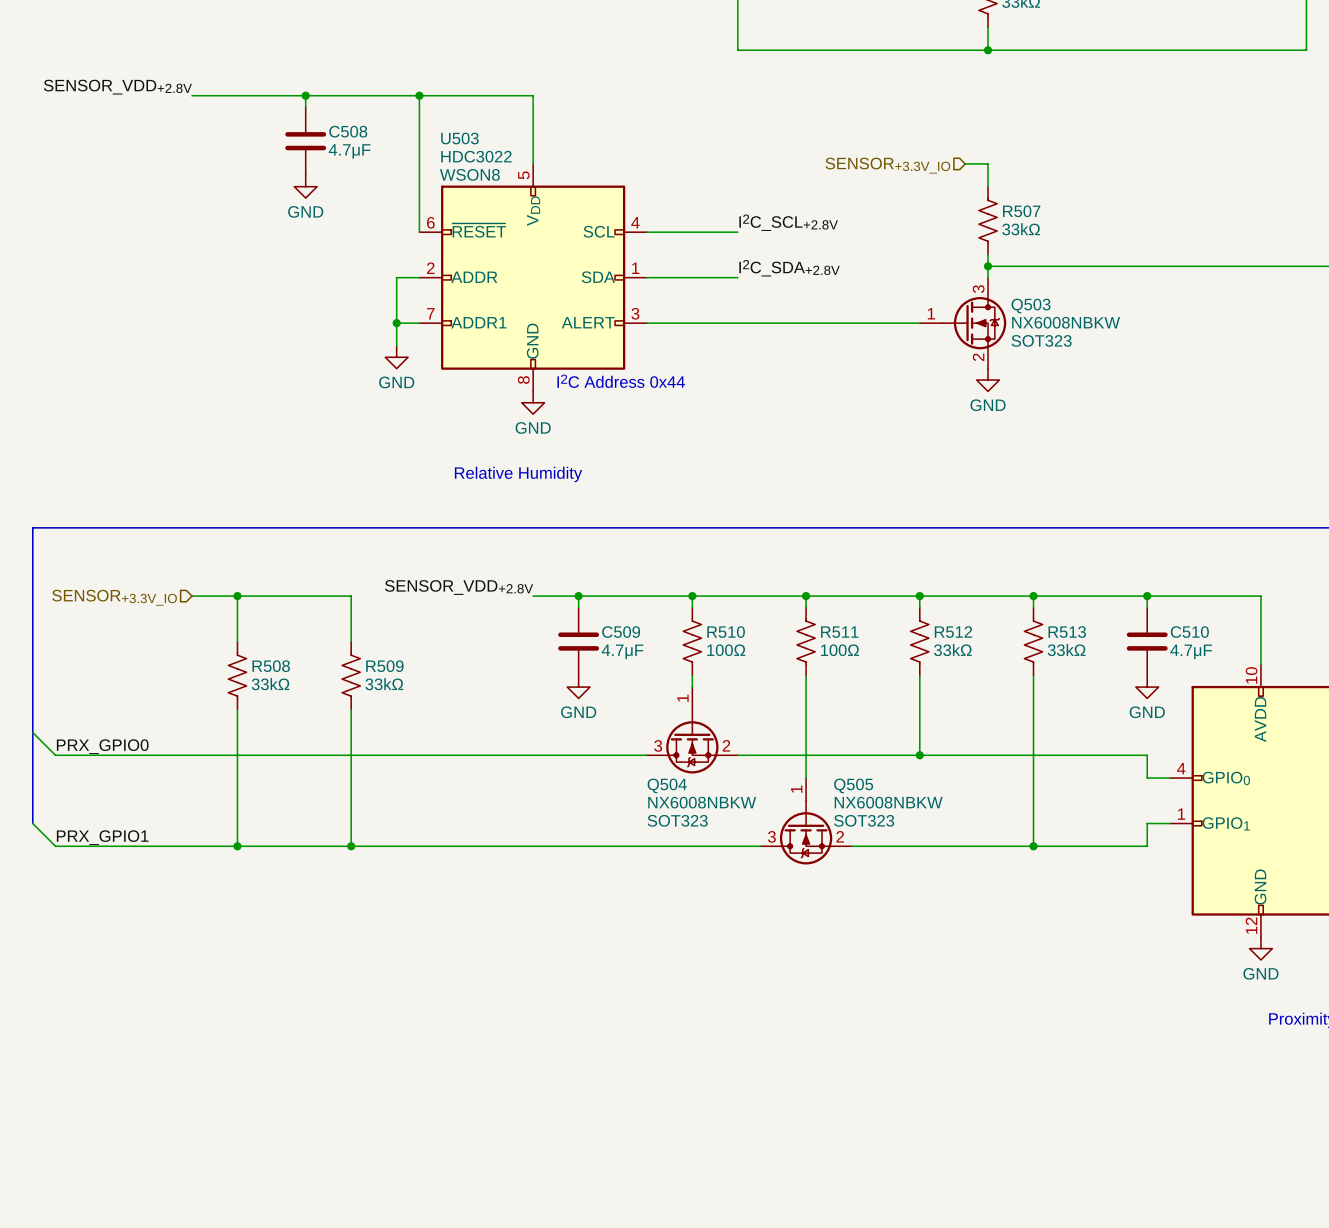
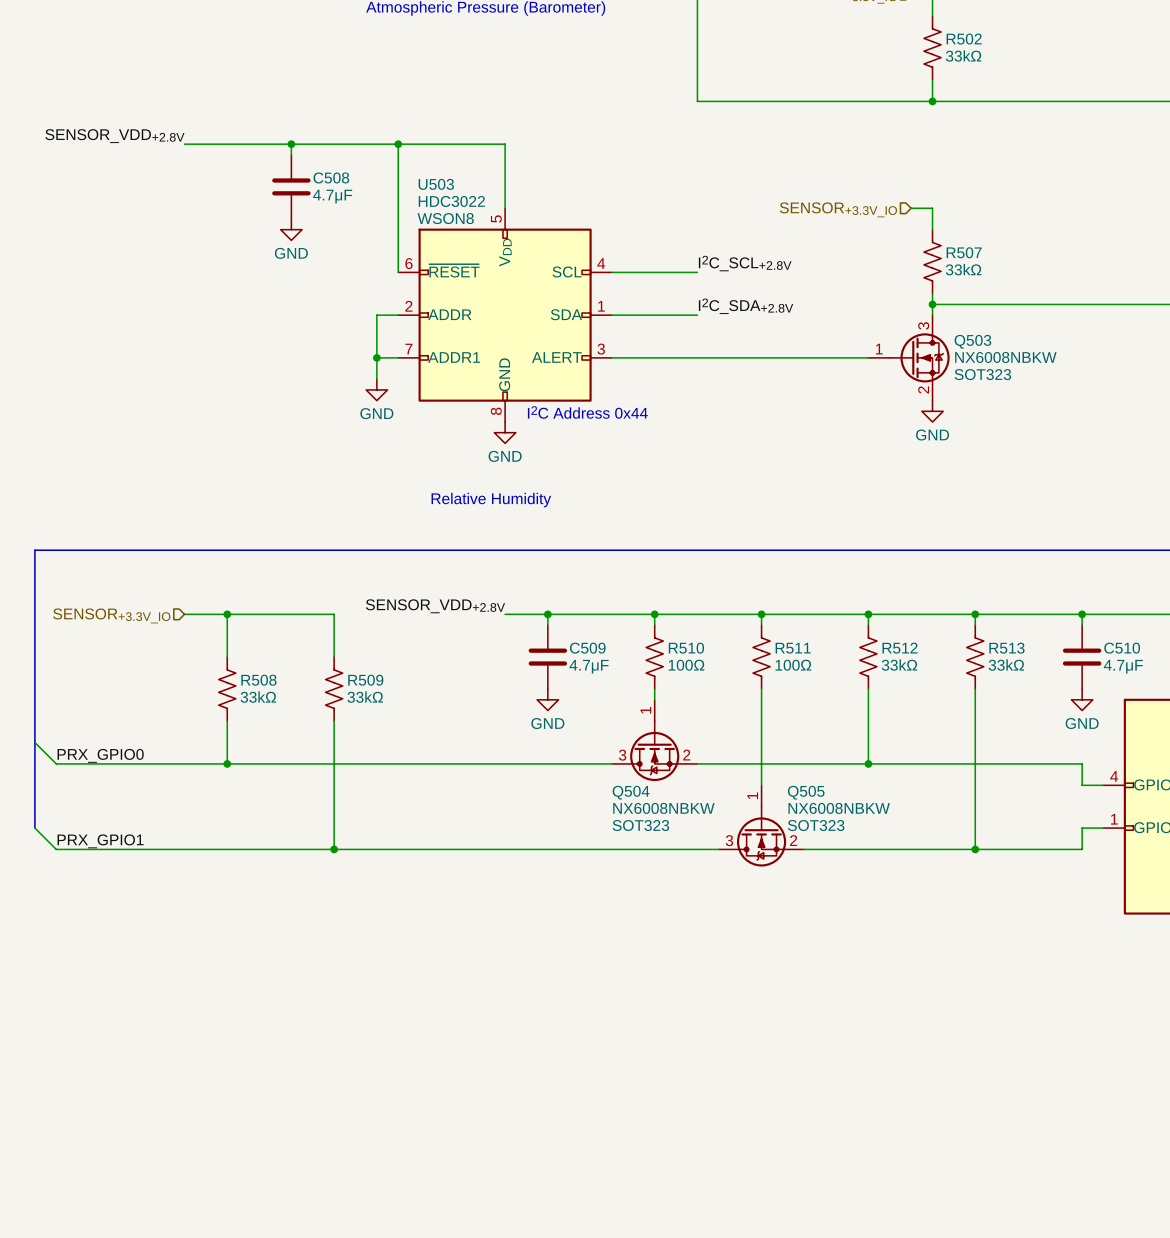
wire: (237, 755) (237, 846) -> none
junction: none -> (227, 763)
junction: (237, 846) -> none

